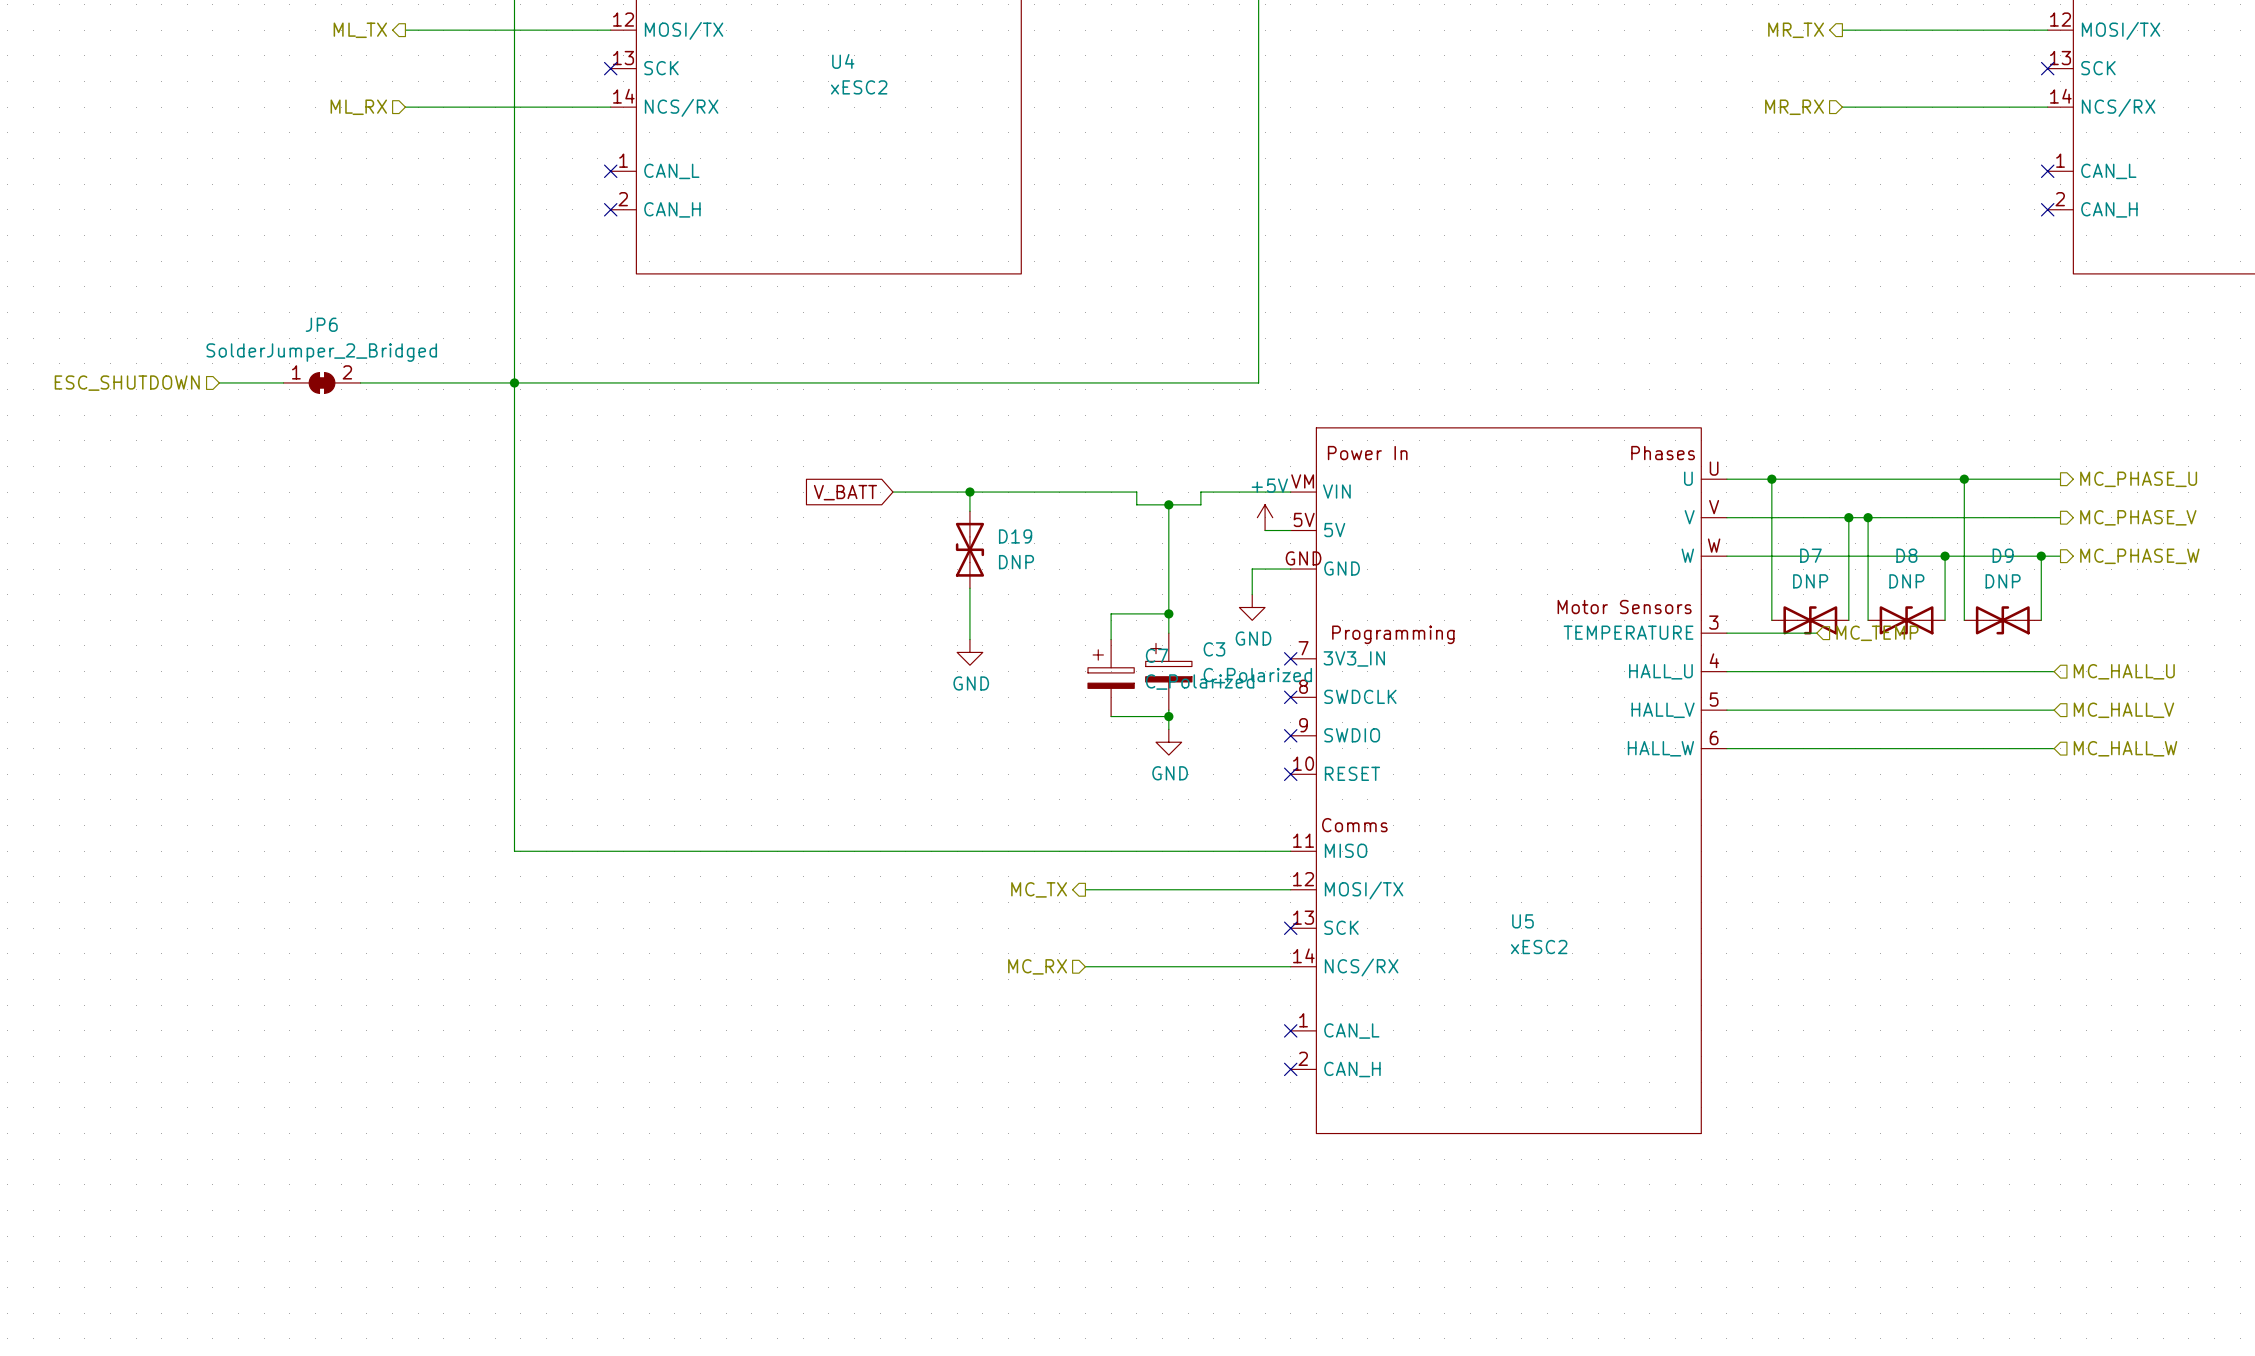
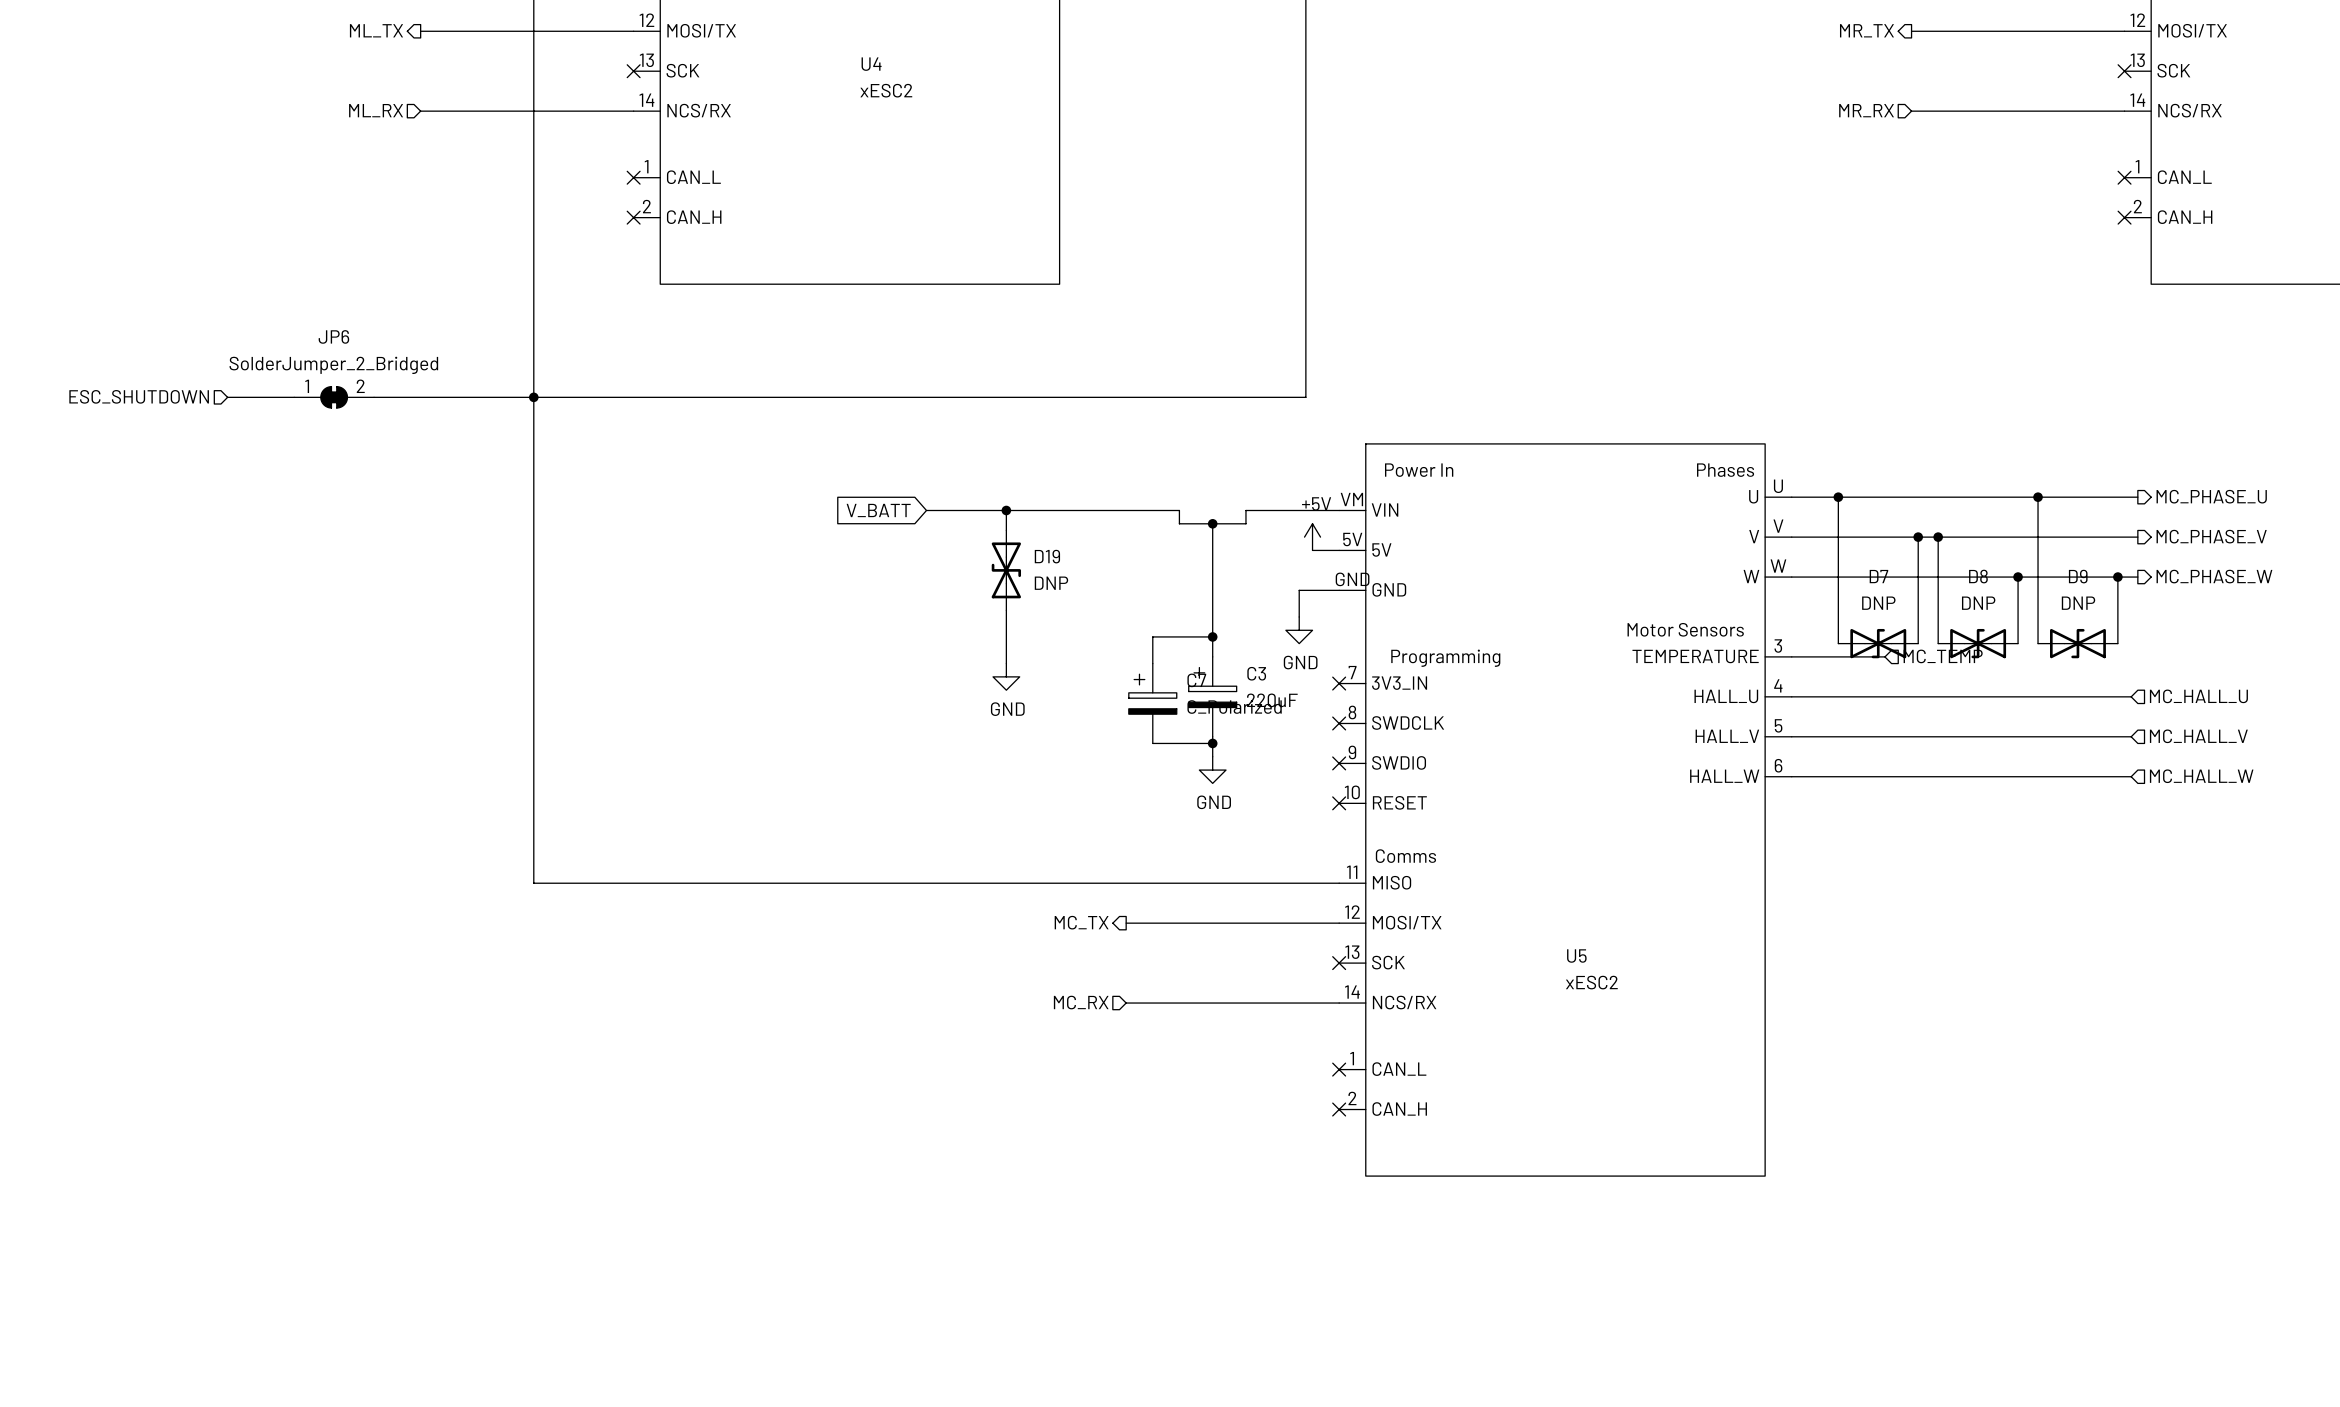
C3 value: C_Polarized (1257, 675) -> 220uF (1272, 700)

